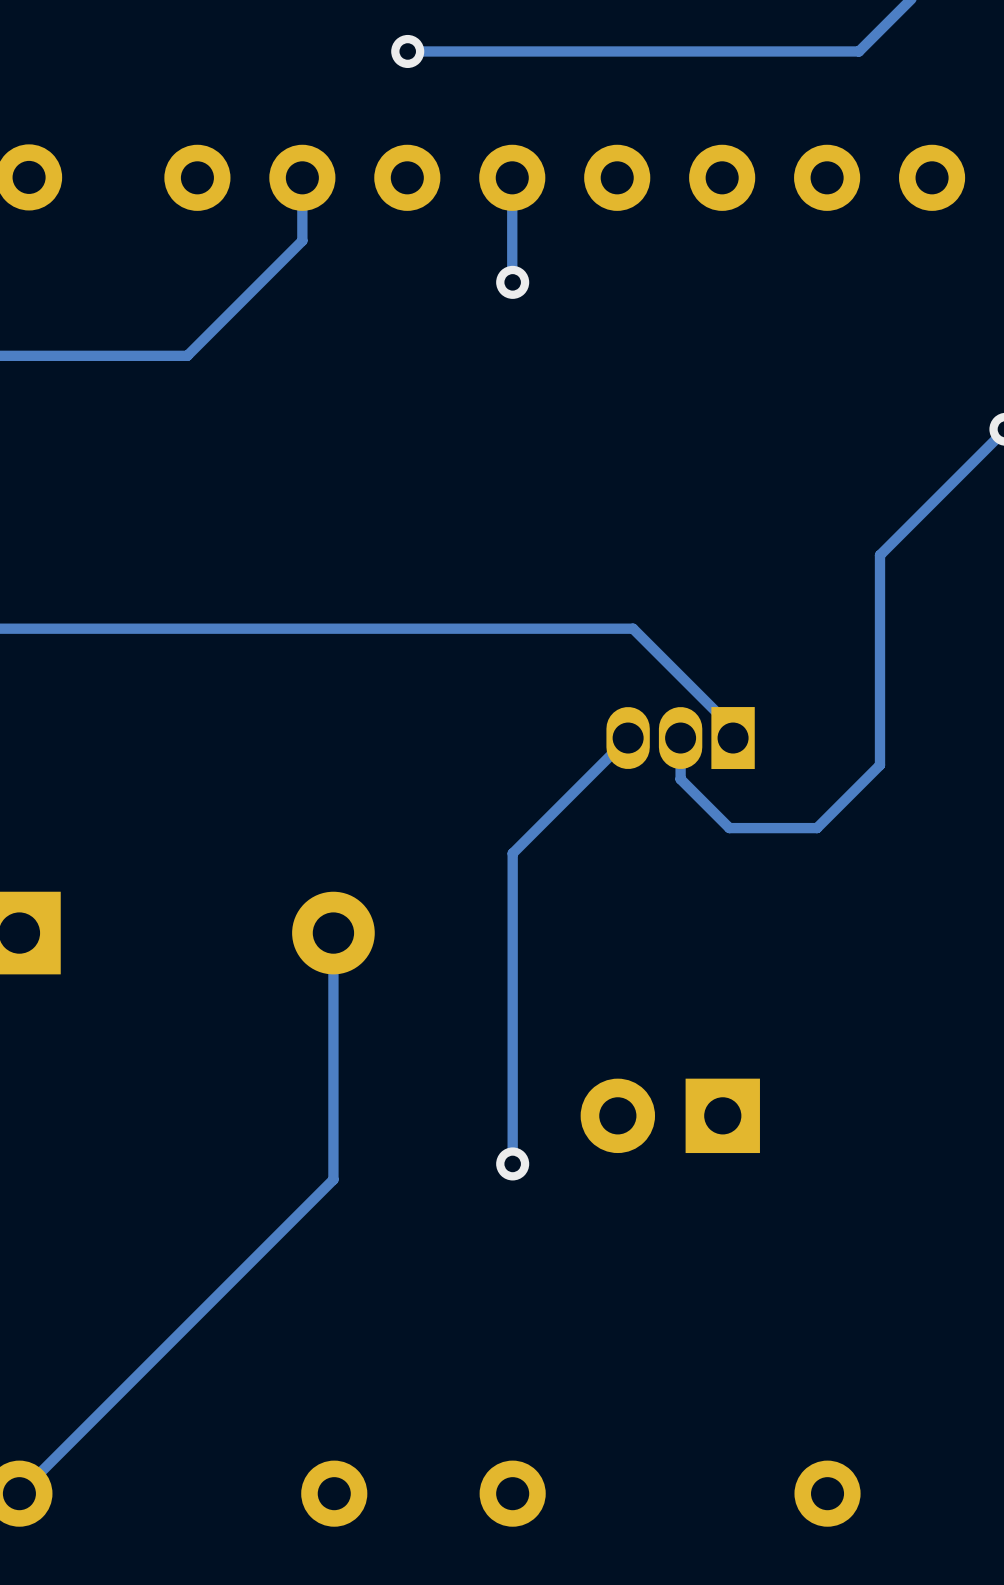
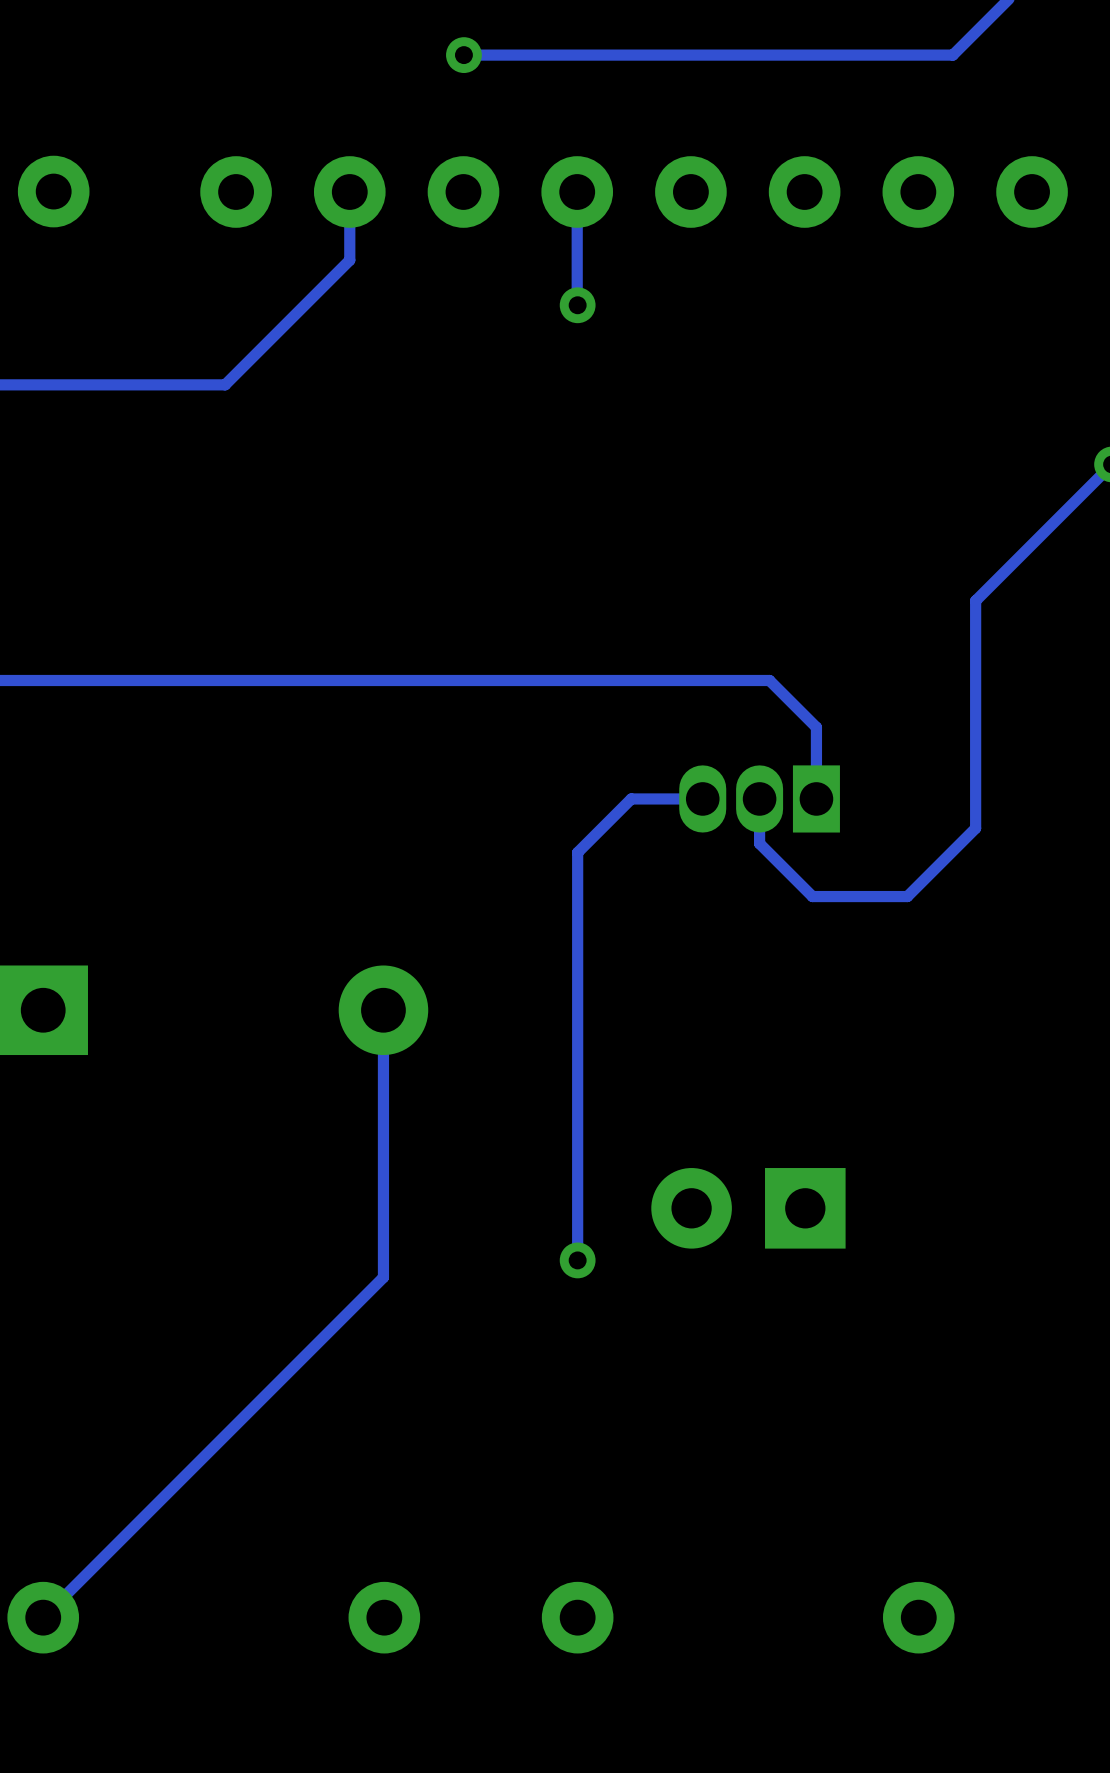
track: (633, 628) (733, 728) -> (708, 680) (769, 680) (816, 727) (816, 788)
track: (628, 738) (512, 853) -> (702, 798) (631, 798) (577, 852) (577, 924)

